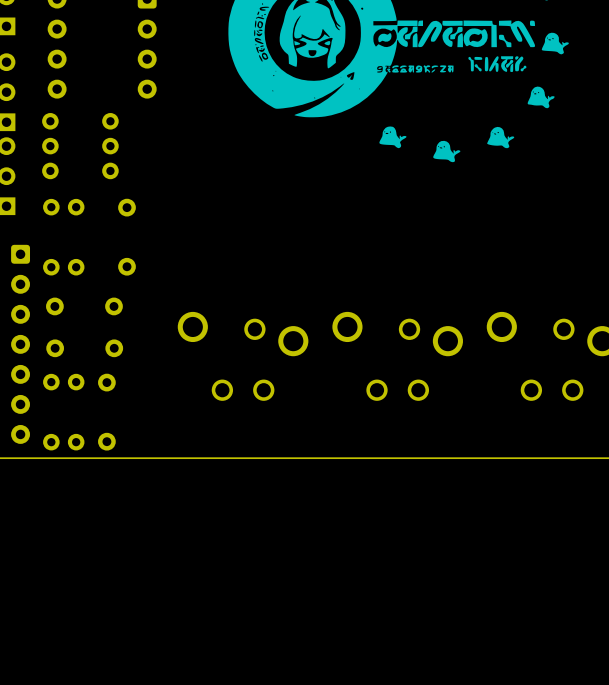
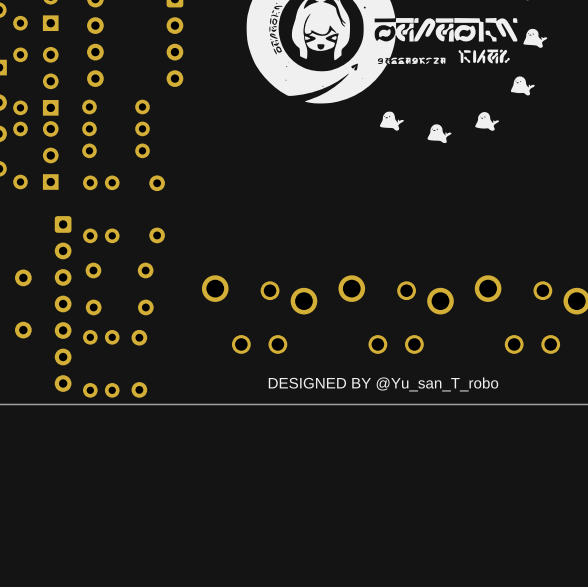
text: none -> DESIGNED BY @Yu_san_T_robo (383, 384)

